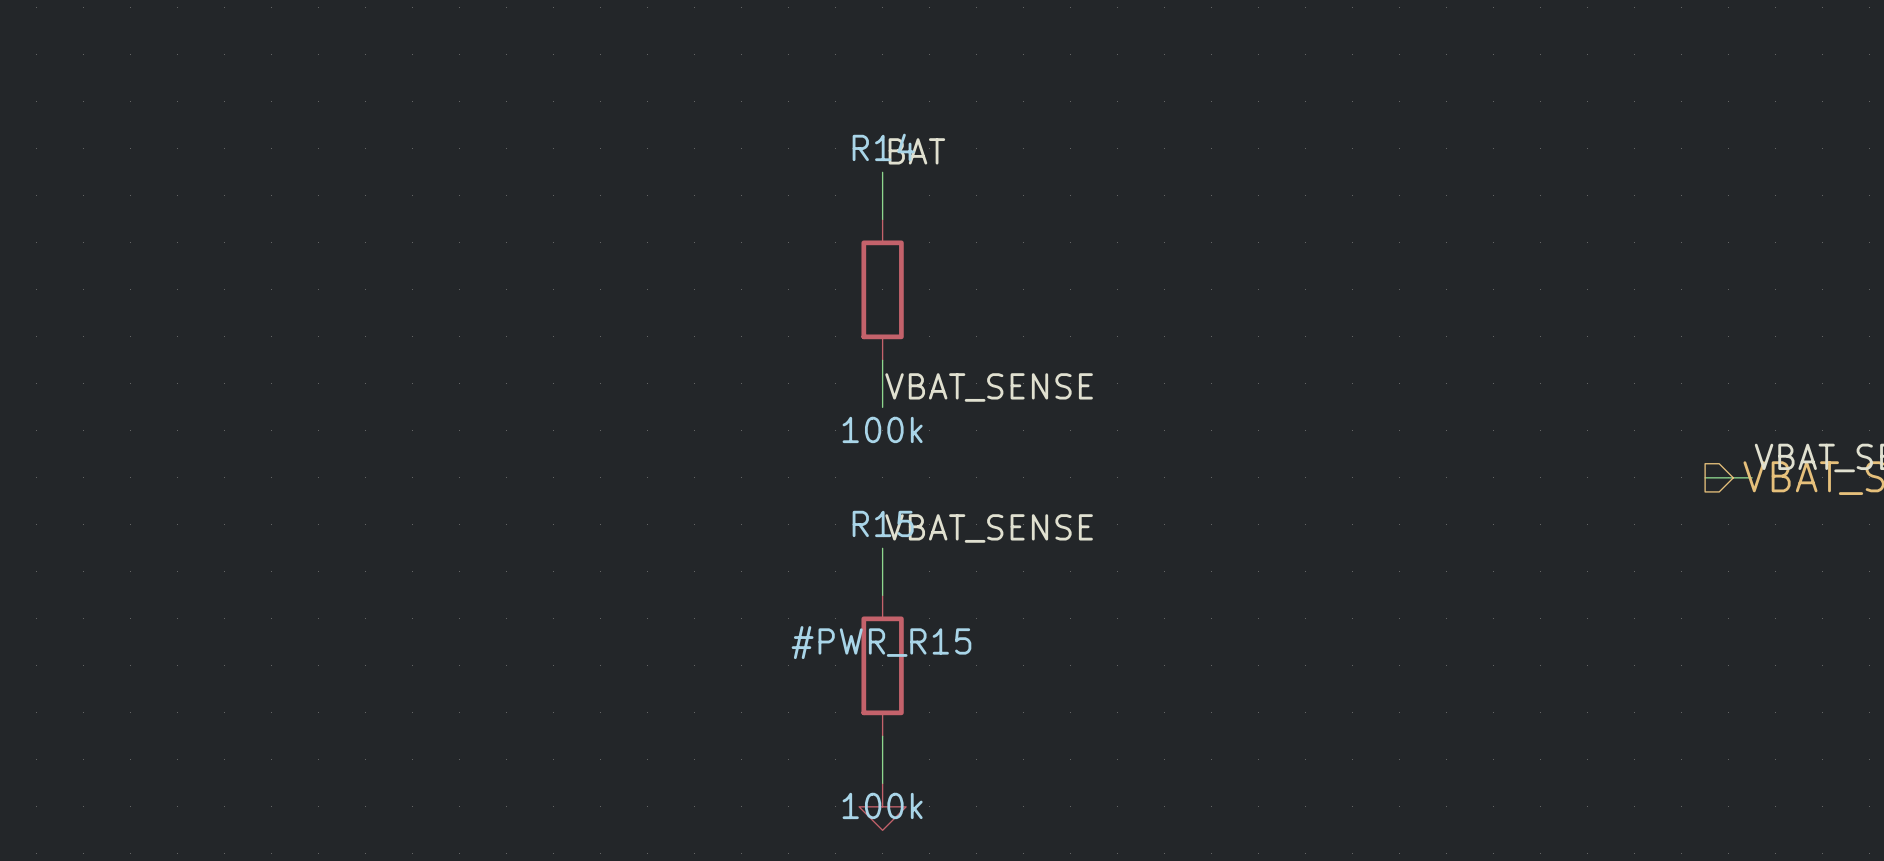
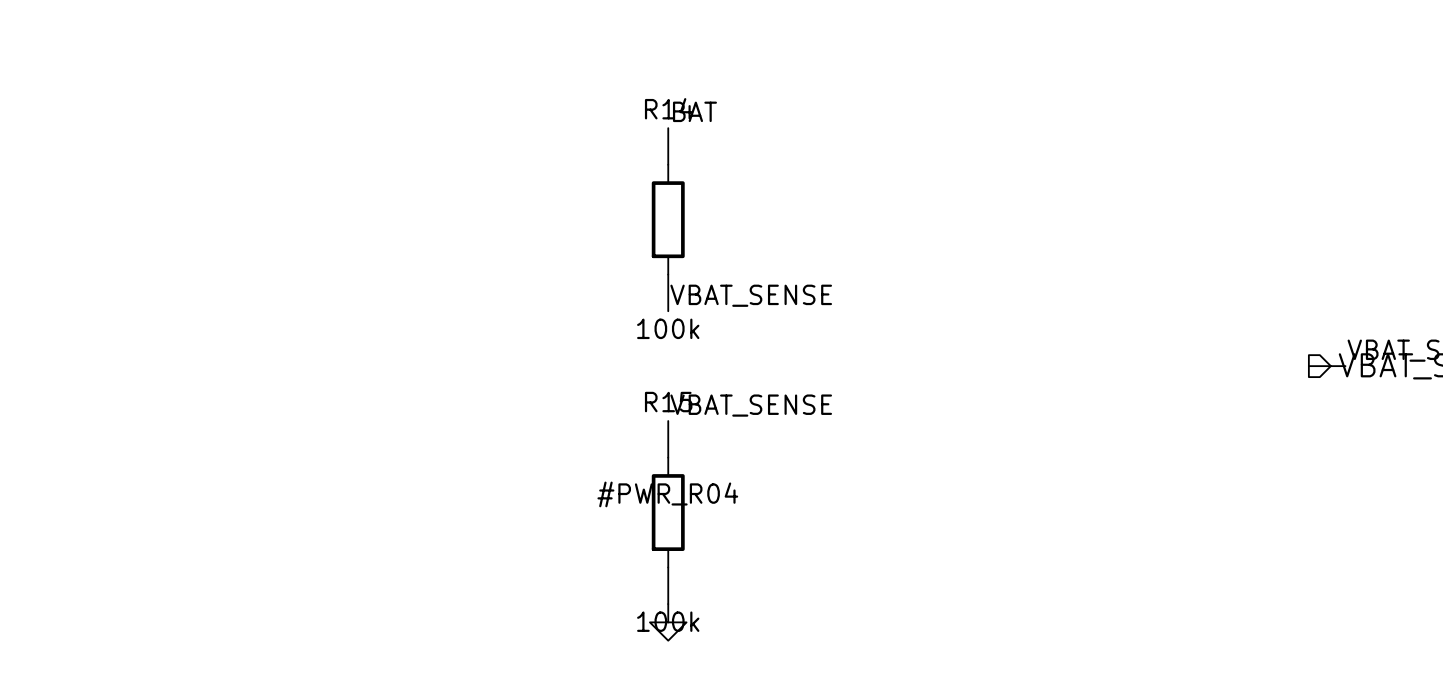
#PWR_R15 name: #PWR_R15 (881, 642) -> #PWR_R04 (667, 494)

